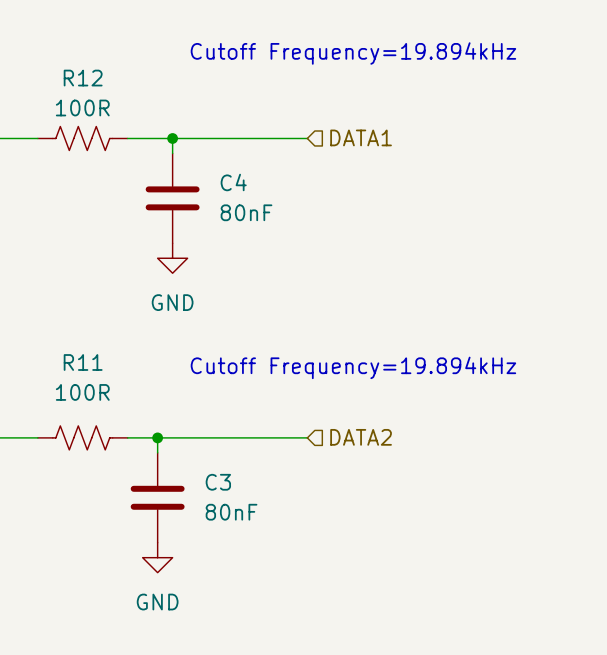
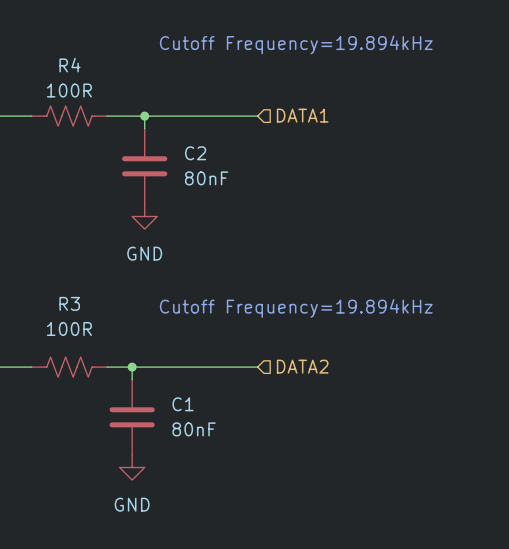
R12 name: R12 (83, 78) -> R4 (70, 65)
C4 name: C4 (233, 182) -> C2 (195, 153)
R11 name: R11 (83, 362) -> R3 (69, 303)
C3 name: C3 (218, 482) -> C1 (183, 404)

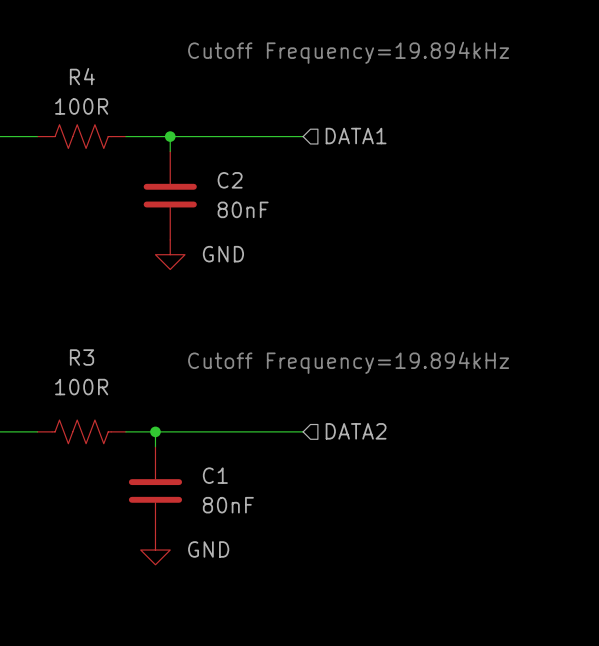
power symbol text position: GND (144, 253) -> GND (223, 254)
power symbol text position: GND (132, 504) -> GND (208, 549)

